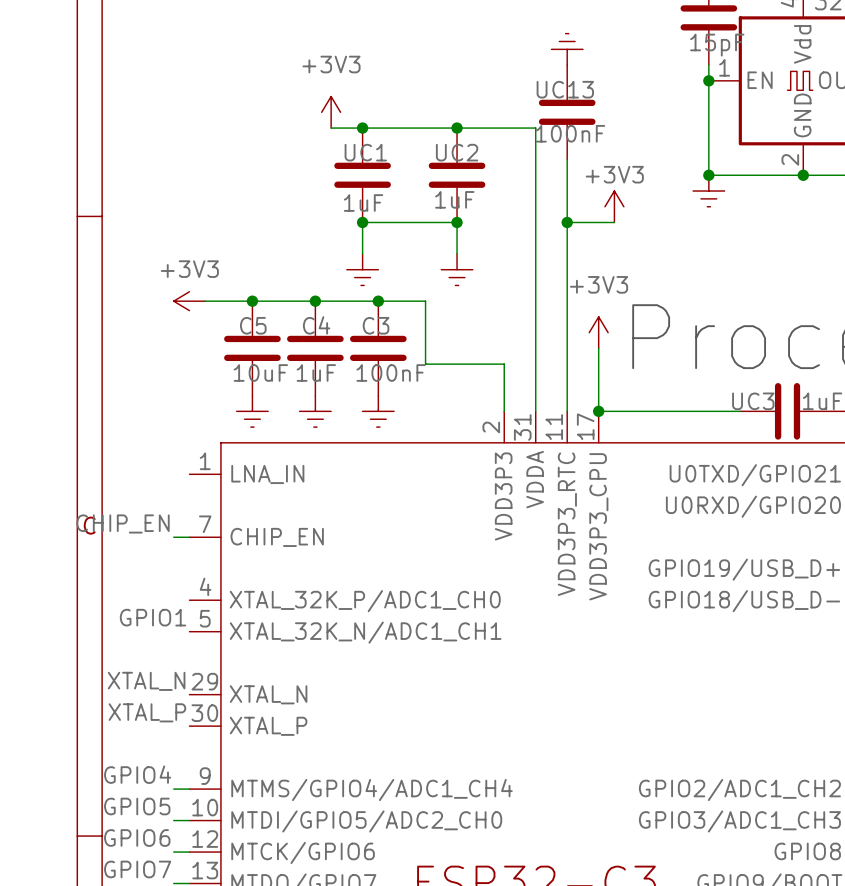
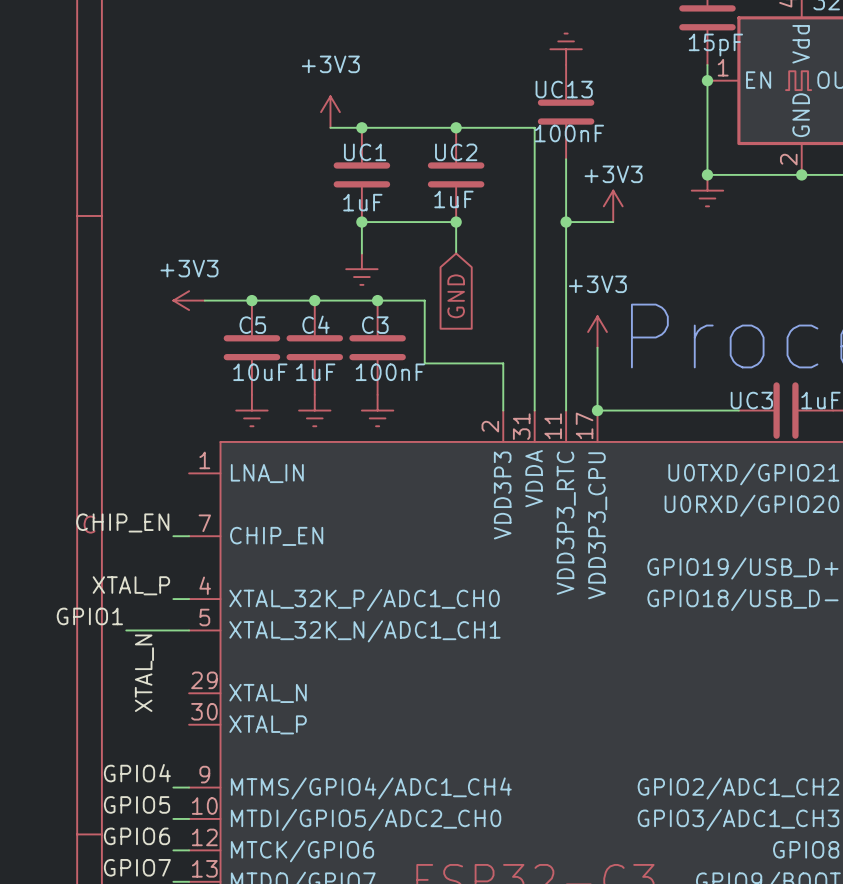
power symbol: (457, 269) -> none
global label: none -> GND (456, 296)
wire: none -> (173, 599) (189, 599)
label position: GPIO1 (153, 617) -> GPIO1 (89, 616)
wire: none -> (126, 630) (189, 630)
label rotation: 0° (146, 681) -> 90° counterclockwise (144, 673)
label position: XTAL_P (147, 712) -> XTAL_P (131, 585)

